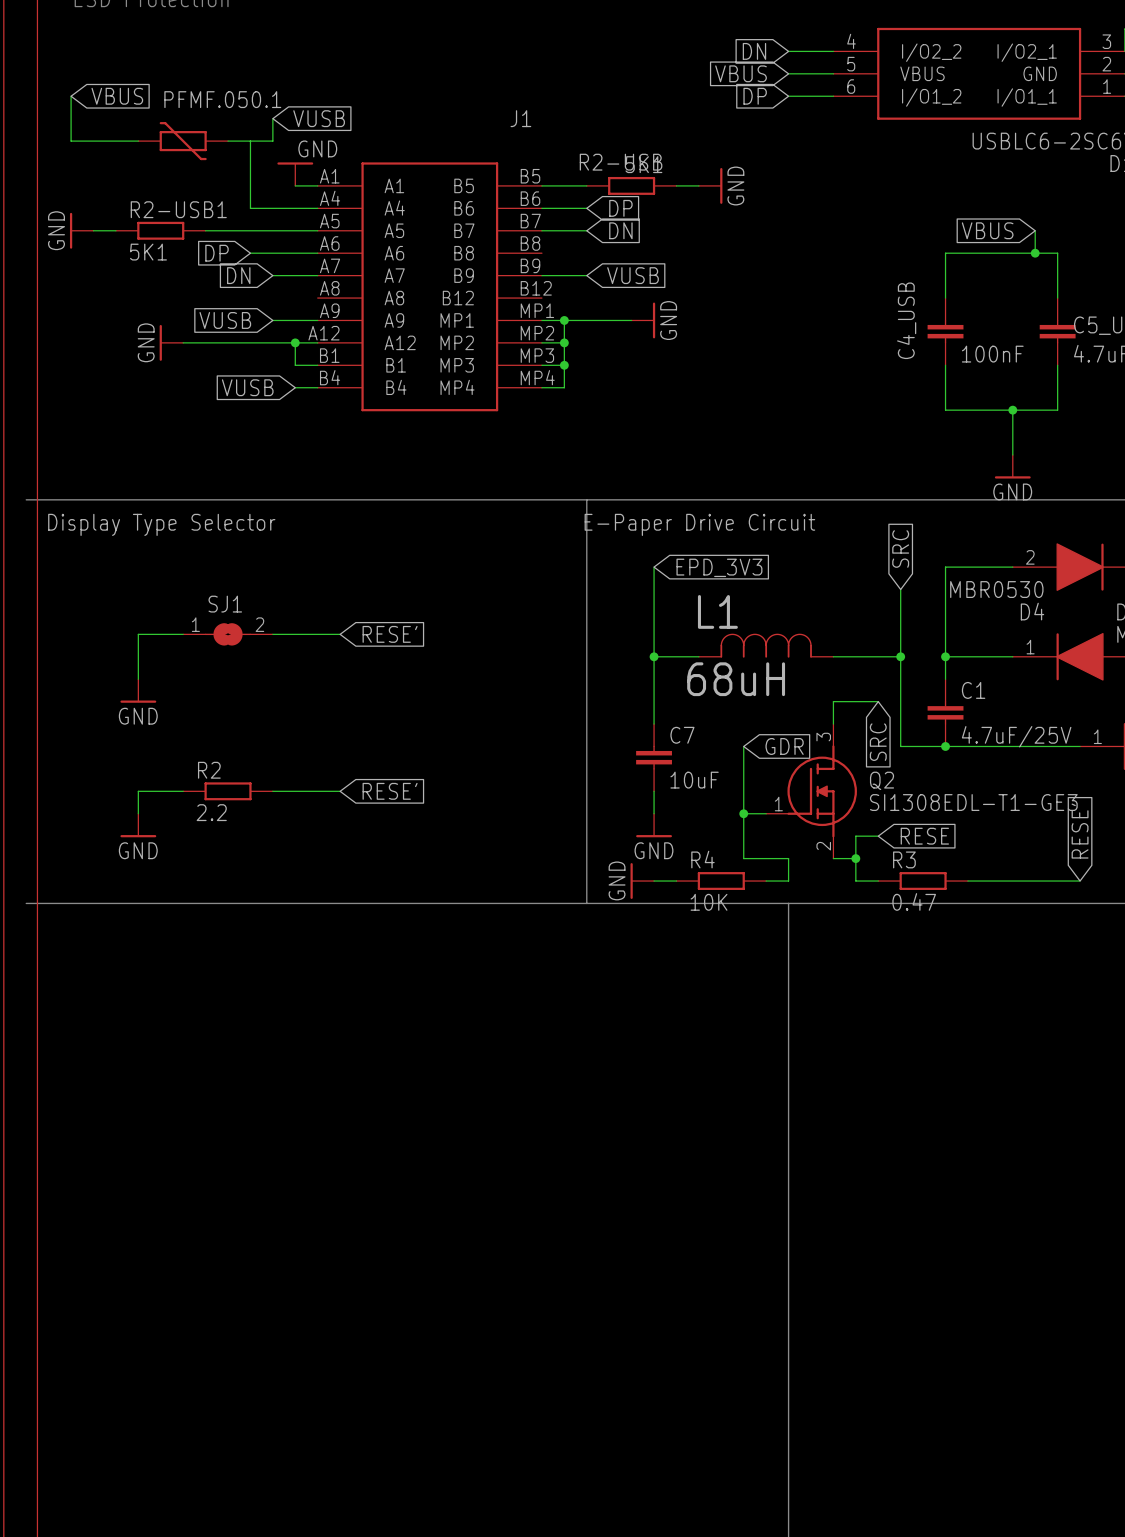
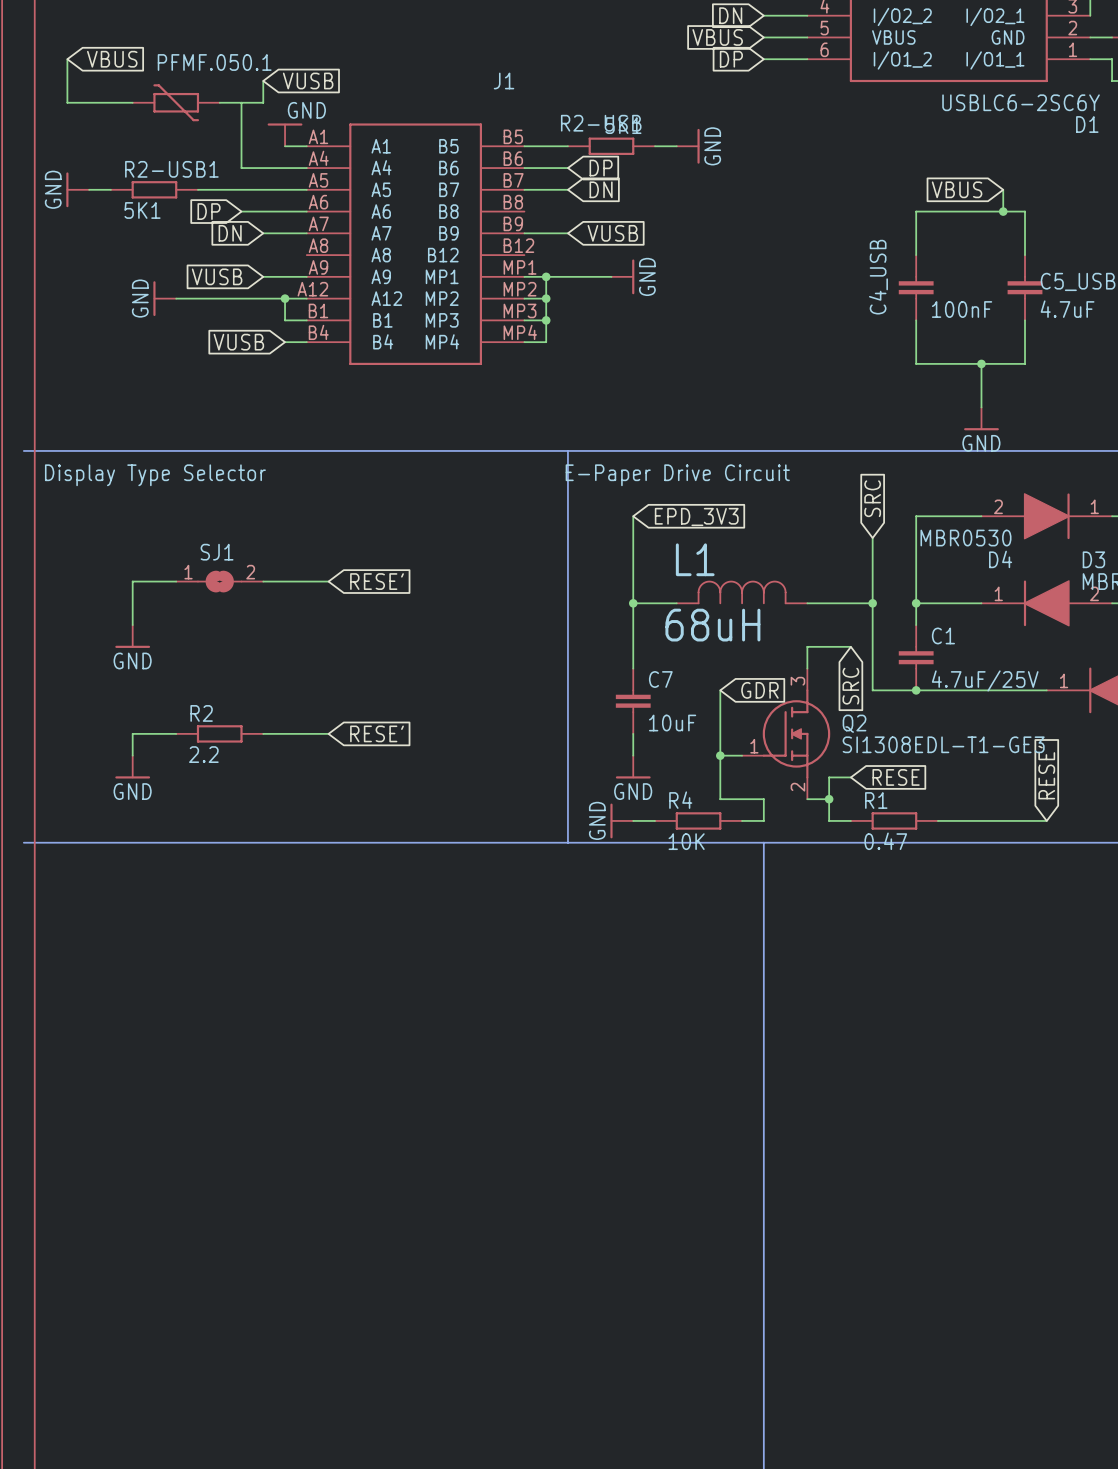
R3 name: R3 (904, 859) -> R1 (876, 800)

